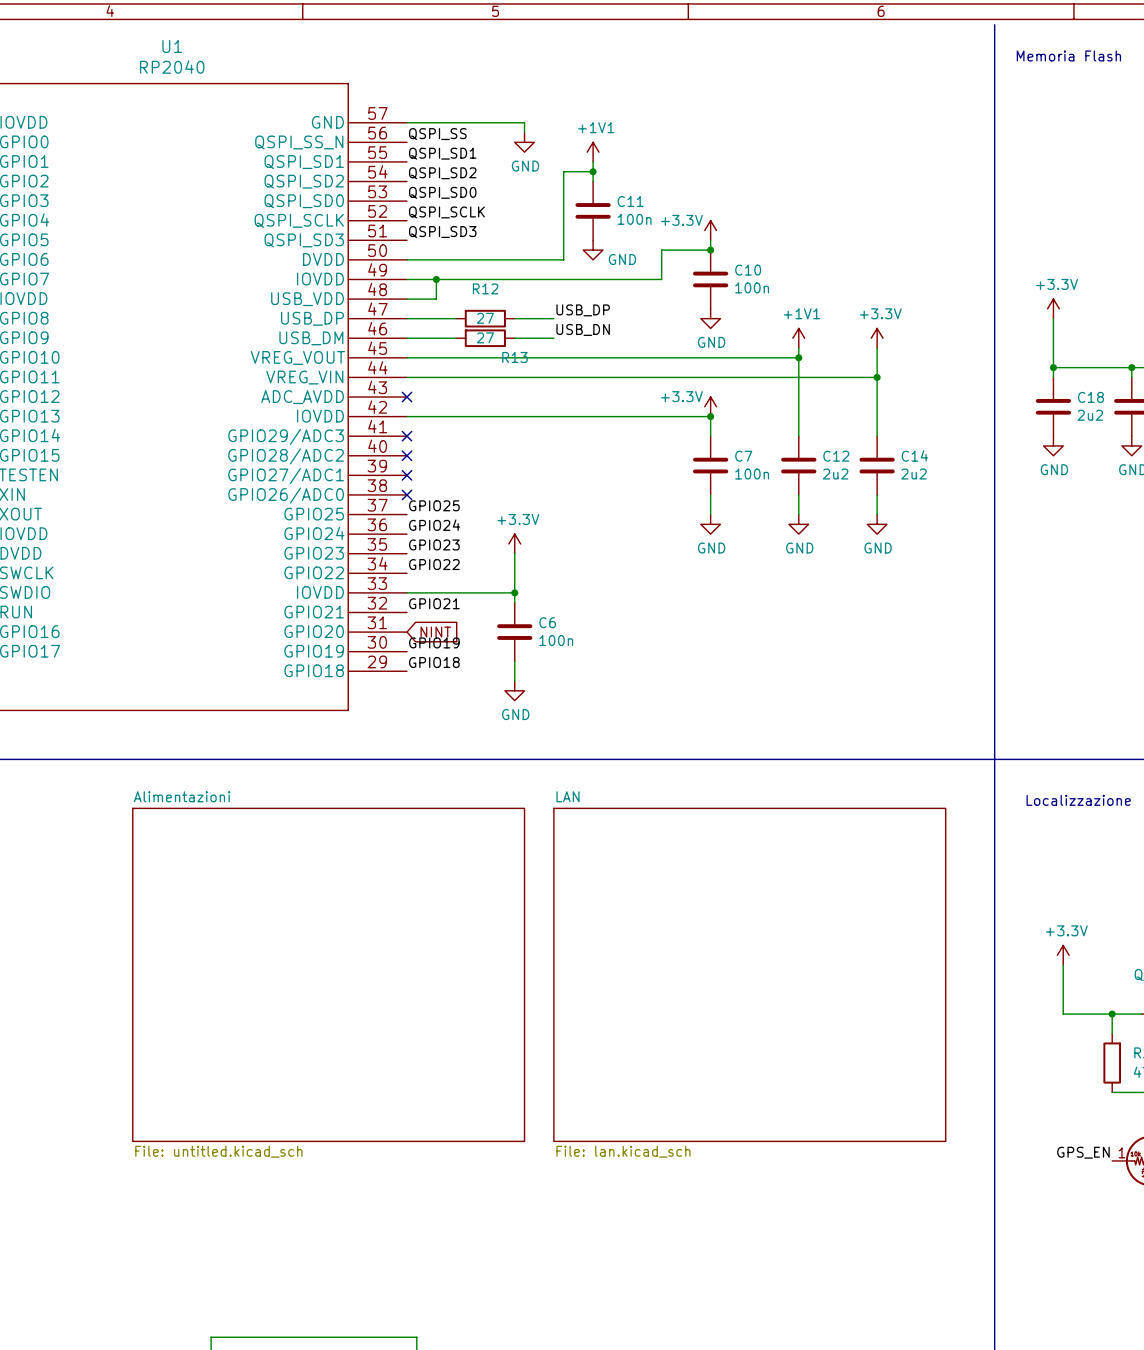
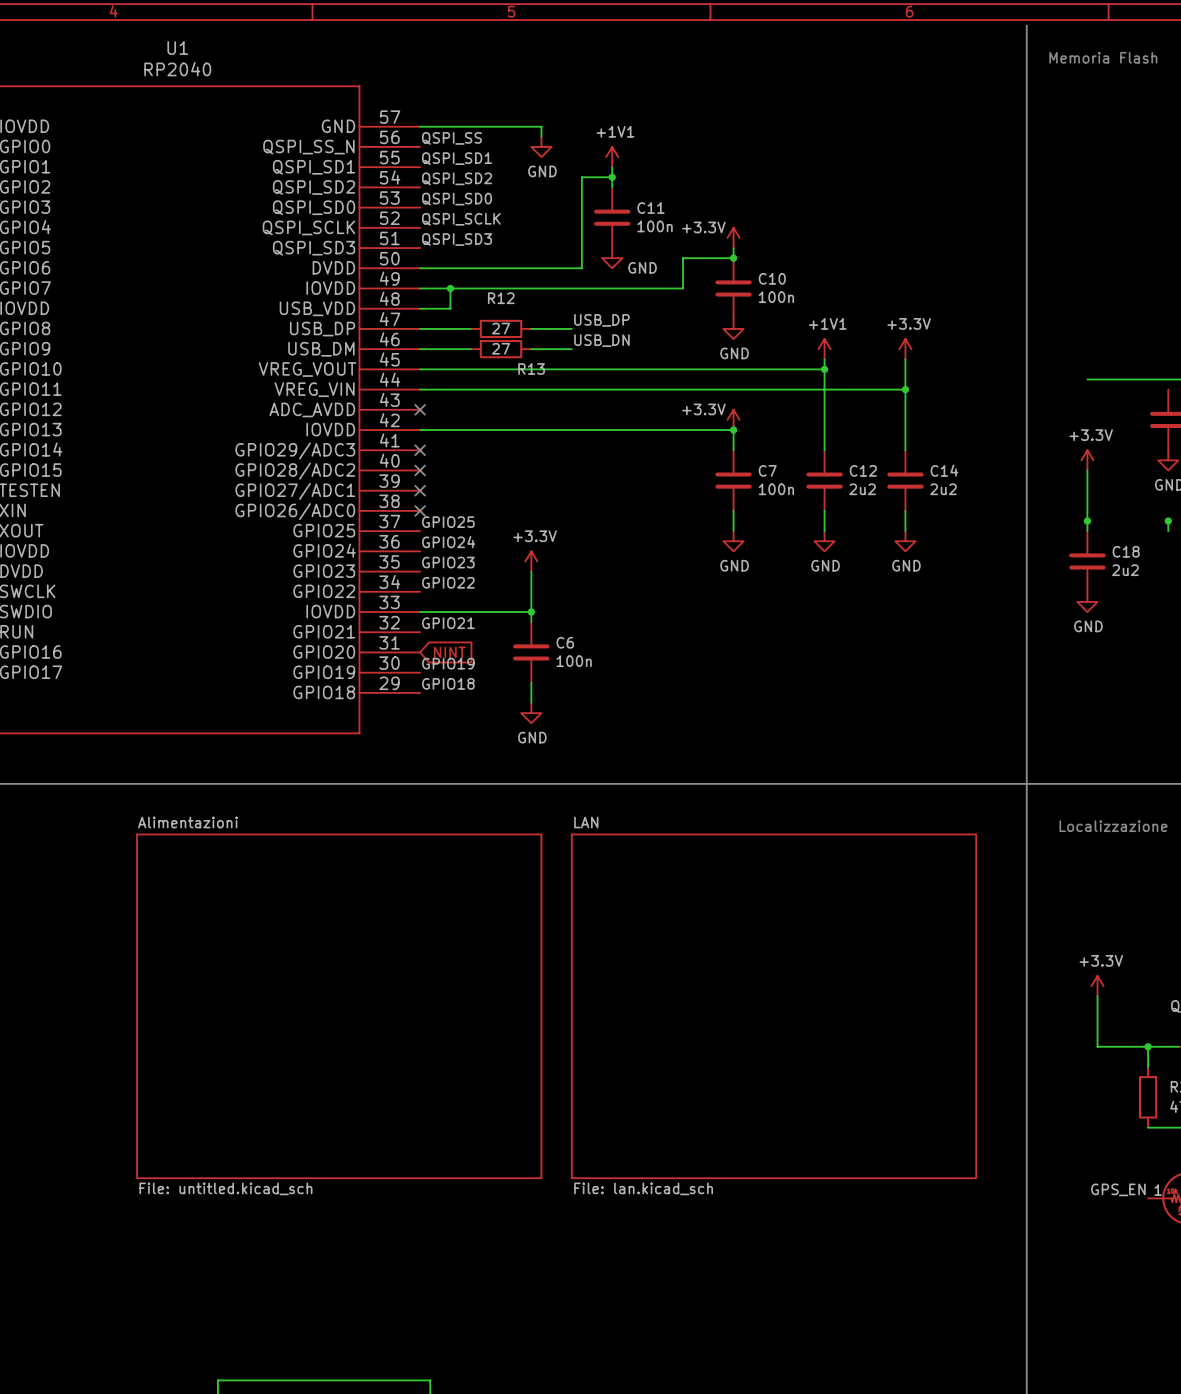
power symbol: +3.3V (1053, 308) -> none
wire: (1053, 318) (1053, 377) -> (1087, 470) (1087, 531)
junction: (1053, 367) -> none
wire: (1131, 367) (1131, 377) -> (1168, 521) (1168, 531)
junction: (1131, 367) -> none
C18 position: (1053, 406) -> (1087, 561)
power symbol: GND (1053, 445) -> +3.3V (1087, 460)
junction: none -> (1087, 521)
junction: none -> (1168, 521)
power symbol: none -> GND (1087, 601)

